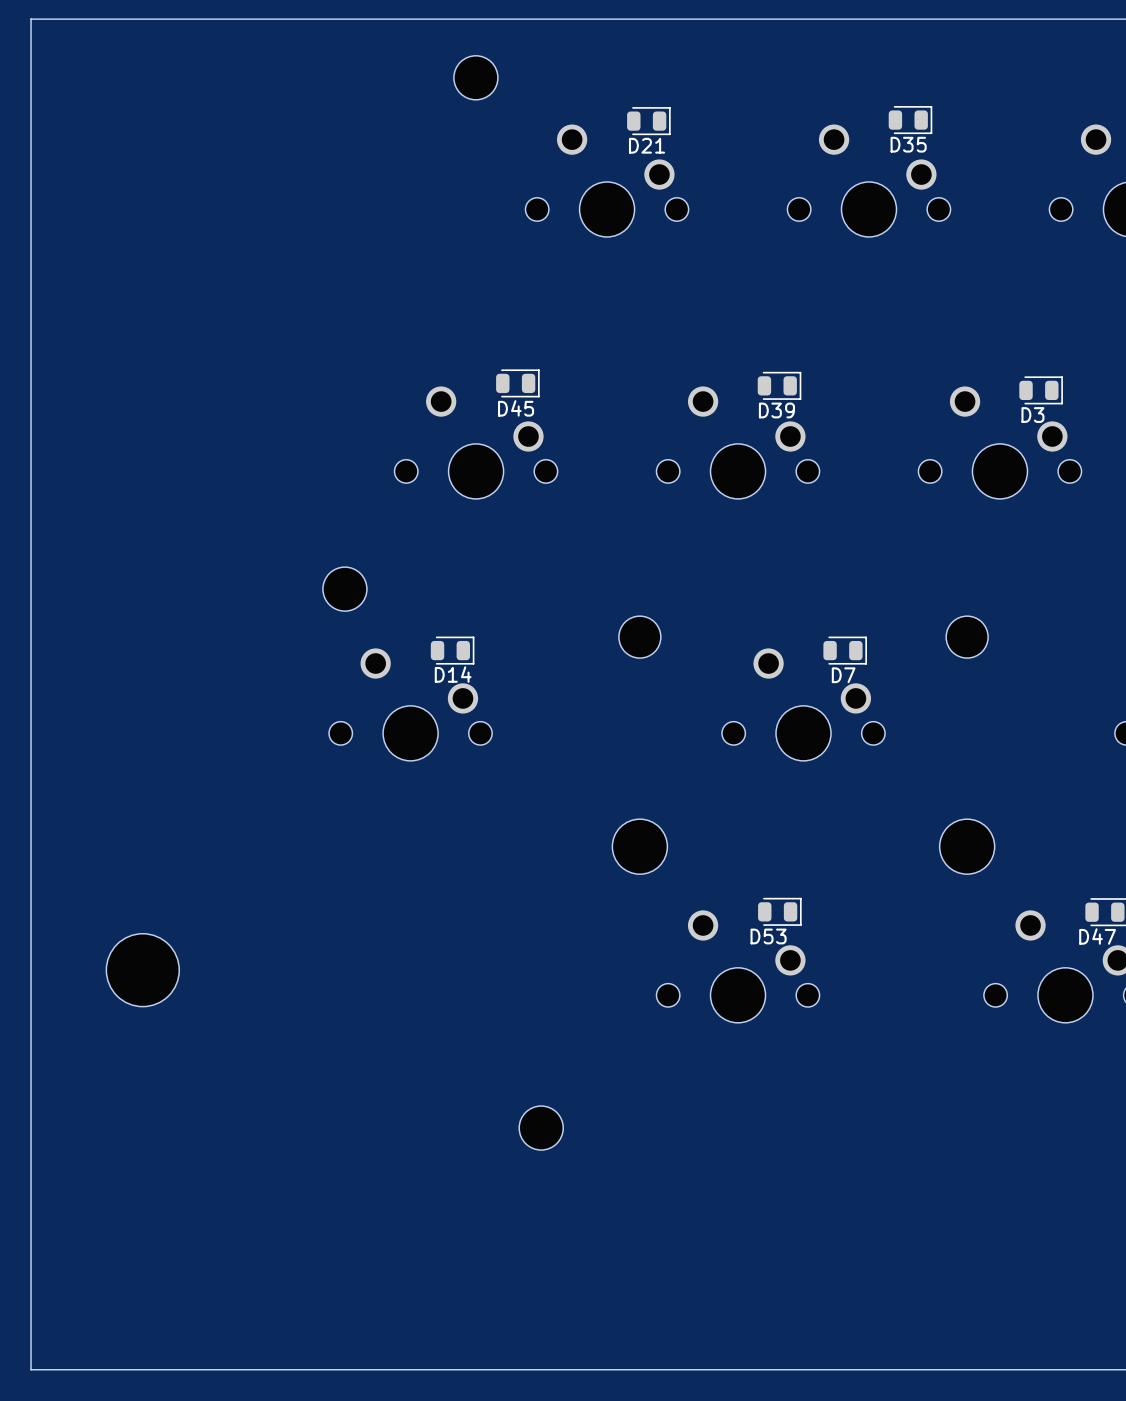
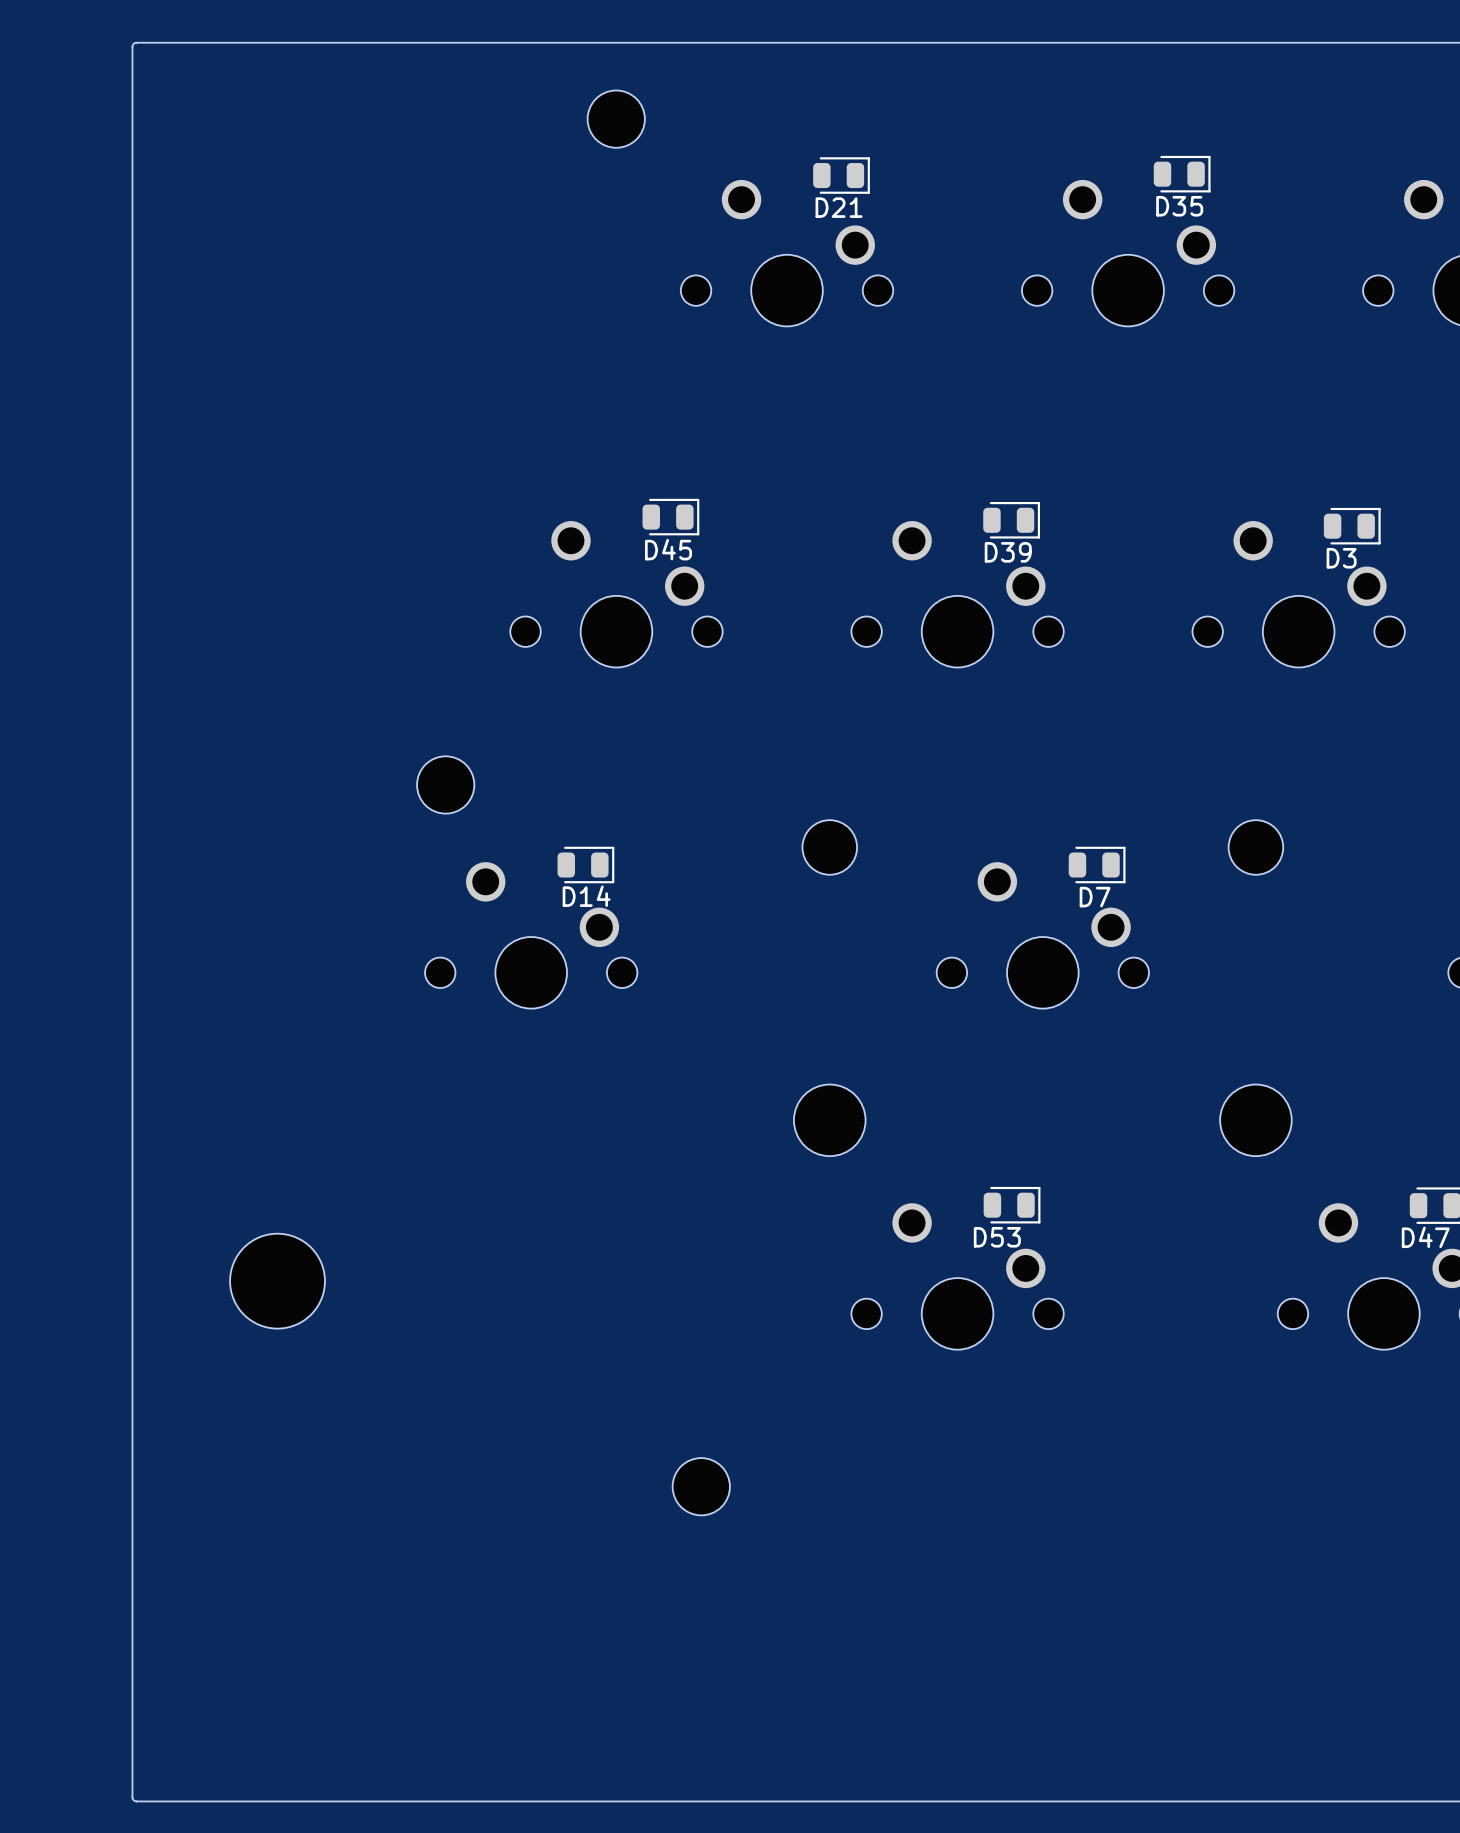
board edge: (107, 19) (31, 19) (31, 1369) (107, 1369) -> (136, 42) (132, 46) (132, 1797) (136, 1801)
part position: (142, 970) -> (277, 1281)

